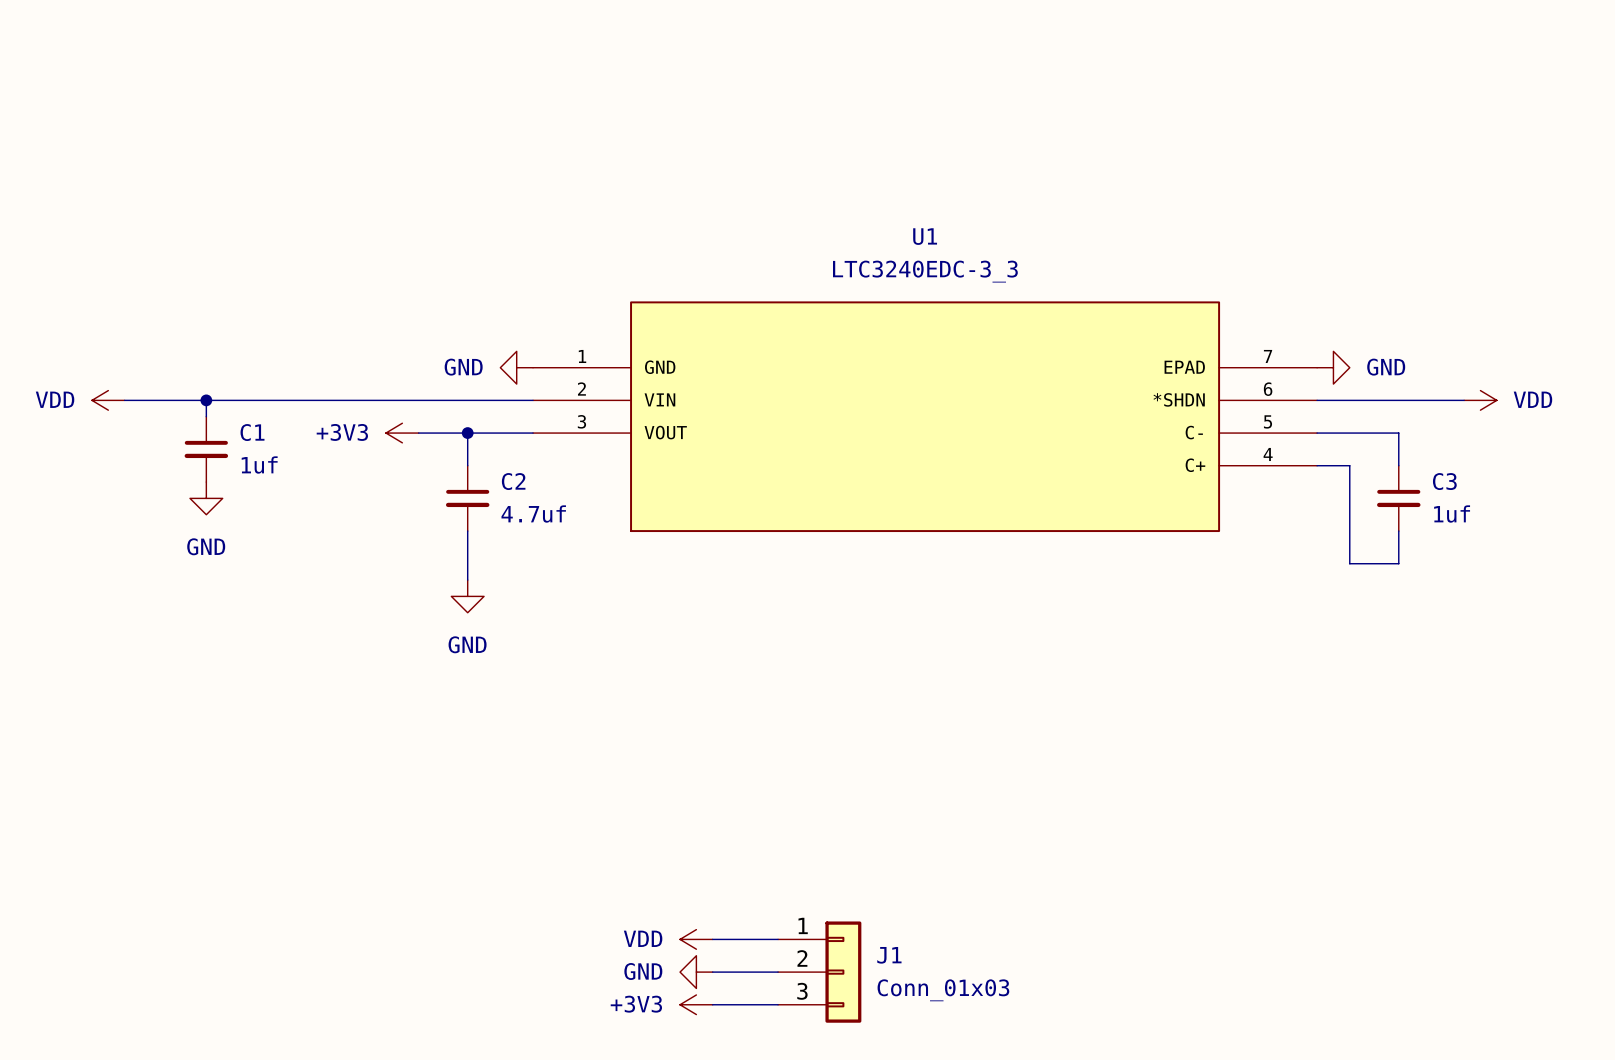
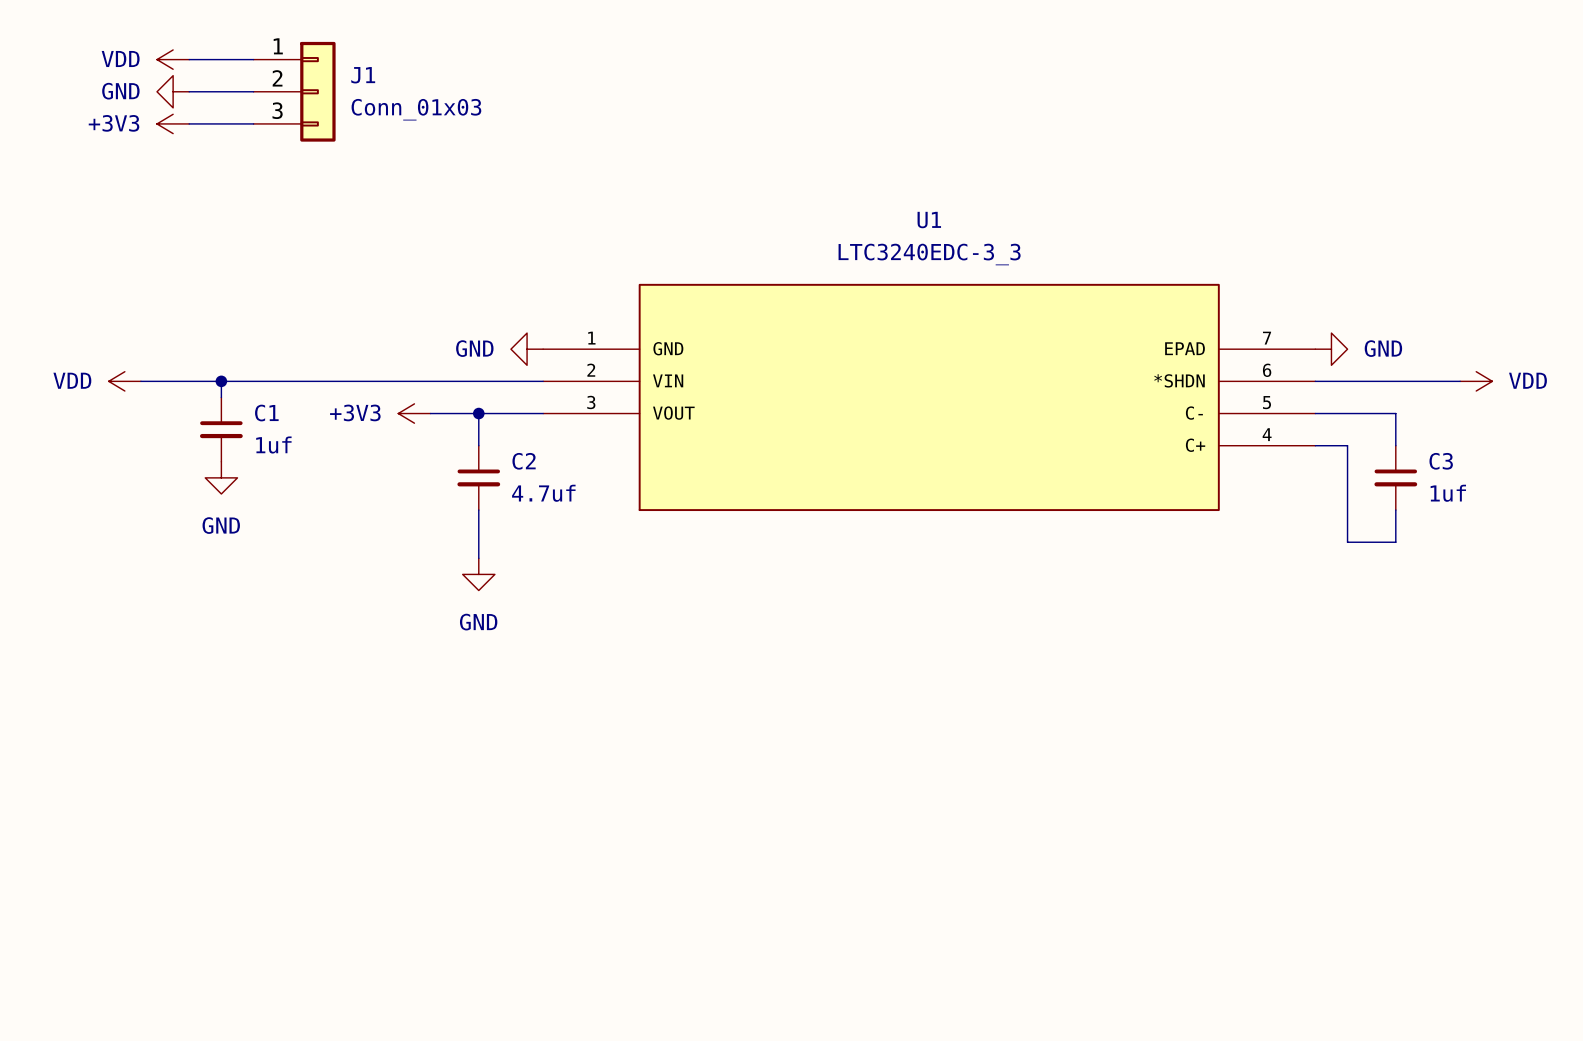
power symbol: none -> VDD (173, 59)
wire: none -> (189, 59) (253, 59)
power symbol: none -> GND (173, 91)
wire: none -> (189, 91) (253, 91)
power symbol: none -> +3V3 (173, 123)
wire: none -> (189, 123) (253, 123)
power symbol: VDD (696, 939) -> none
wire: (712, 939) (778, 939) -> none
power symbol: GND (696, 972) -> none
wire: (712, 972) (778, 972) -> none
J1 position: (819, 972) -> (294, 91)
power symbol: +3V3 (696, 1004) -> none
wire: (712, 1004) (778, 1004) -> none

